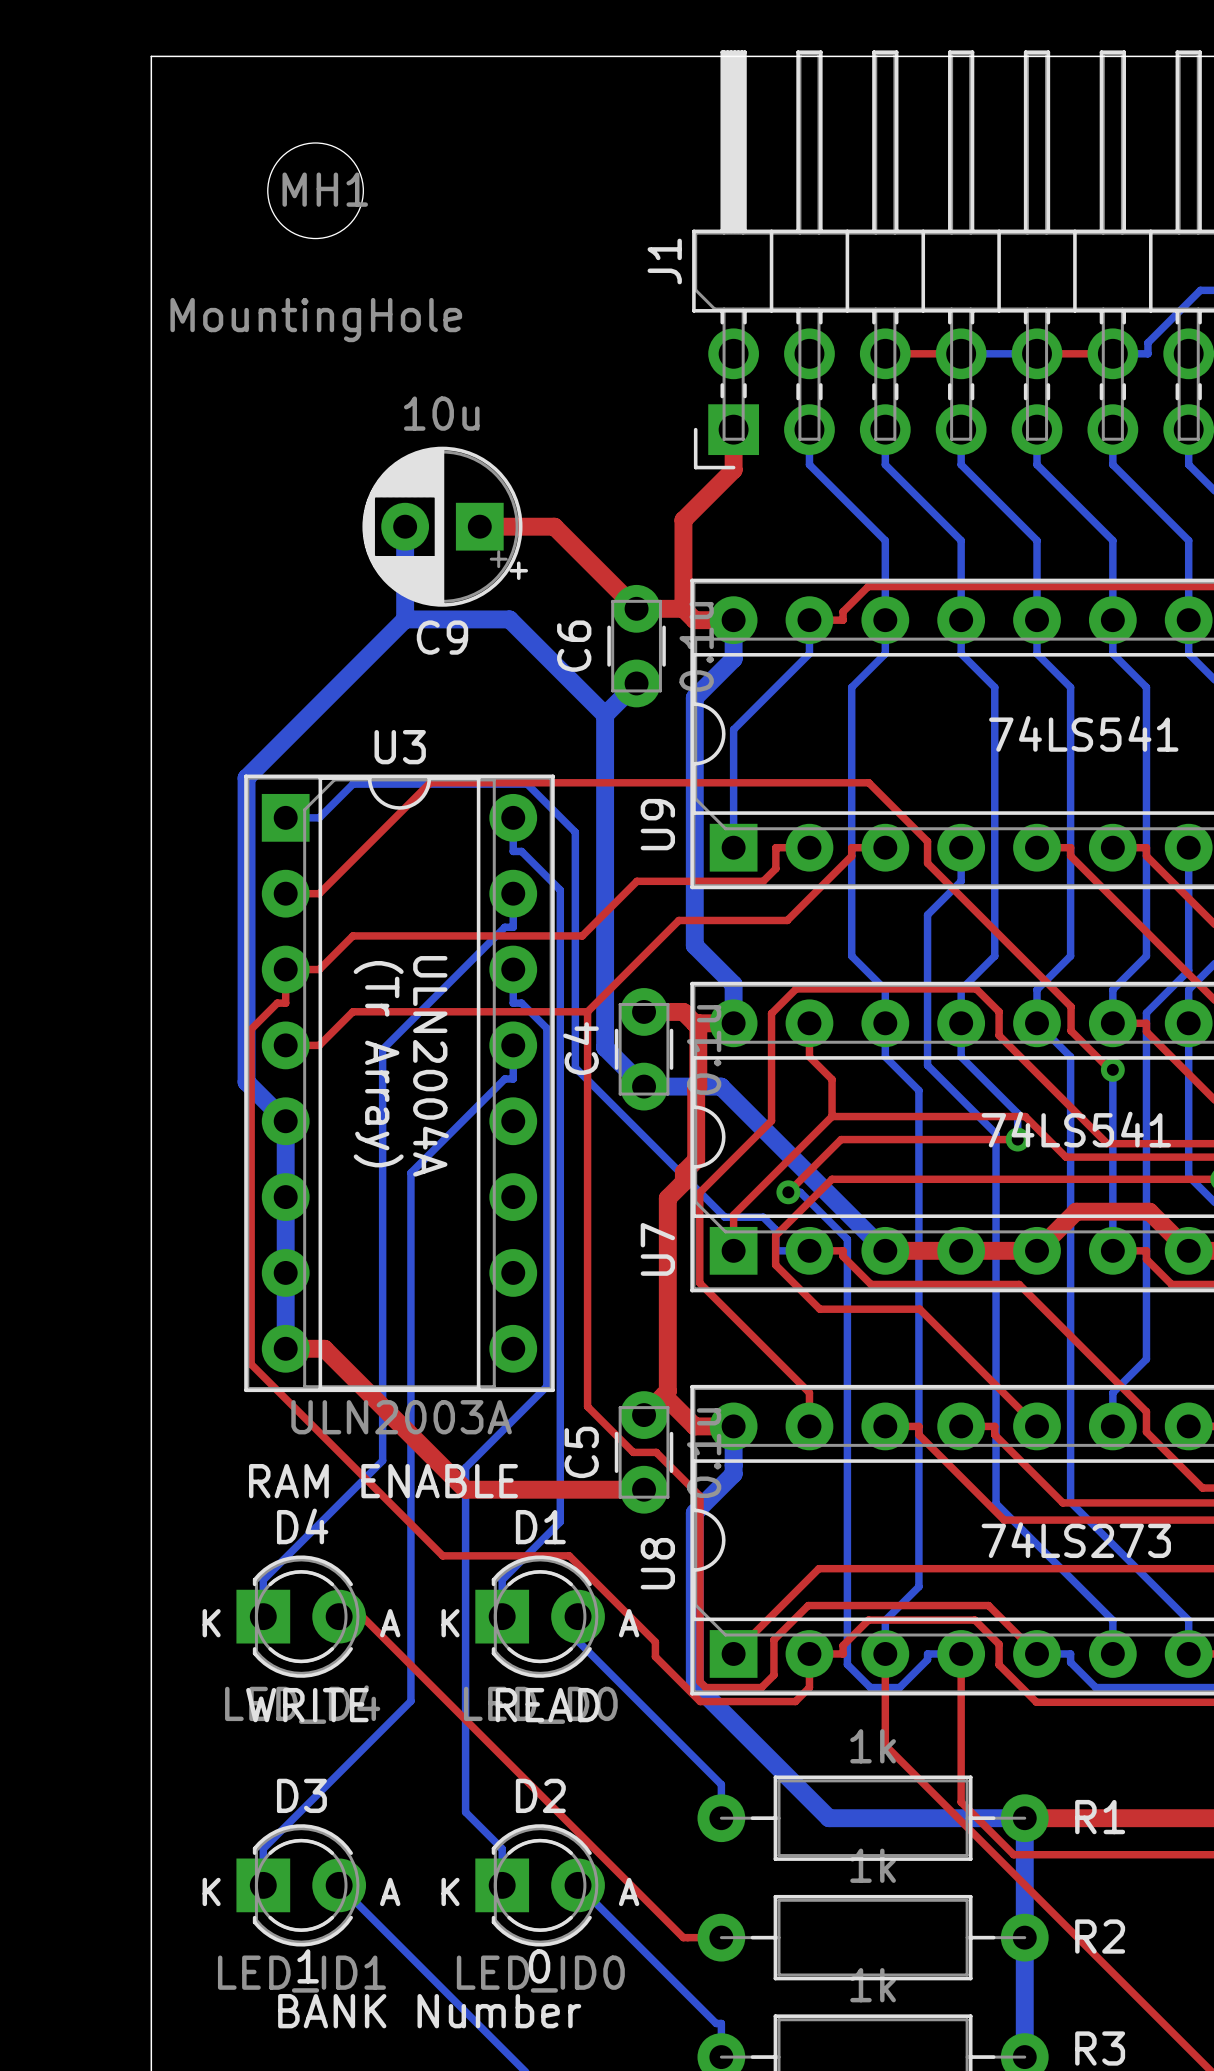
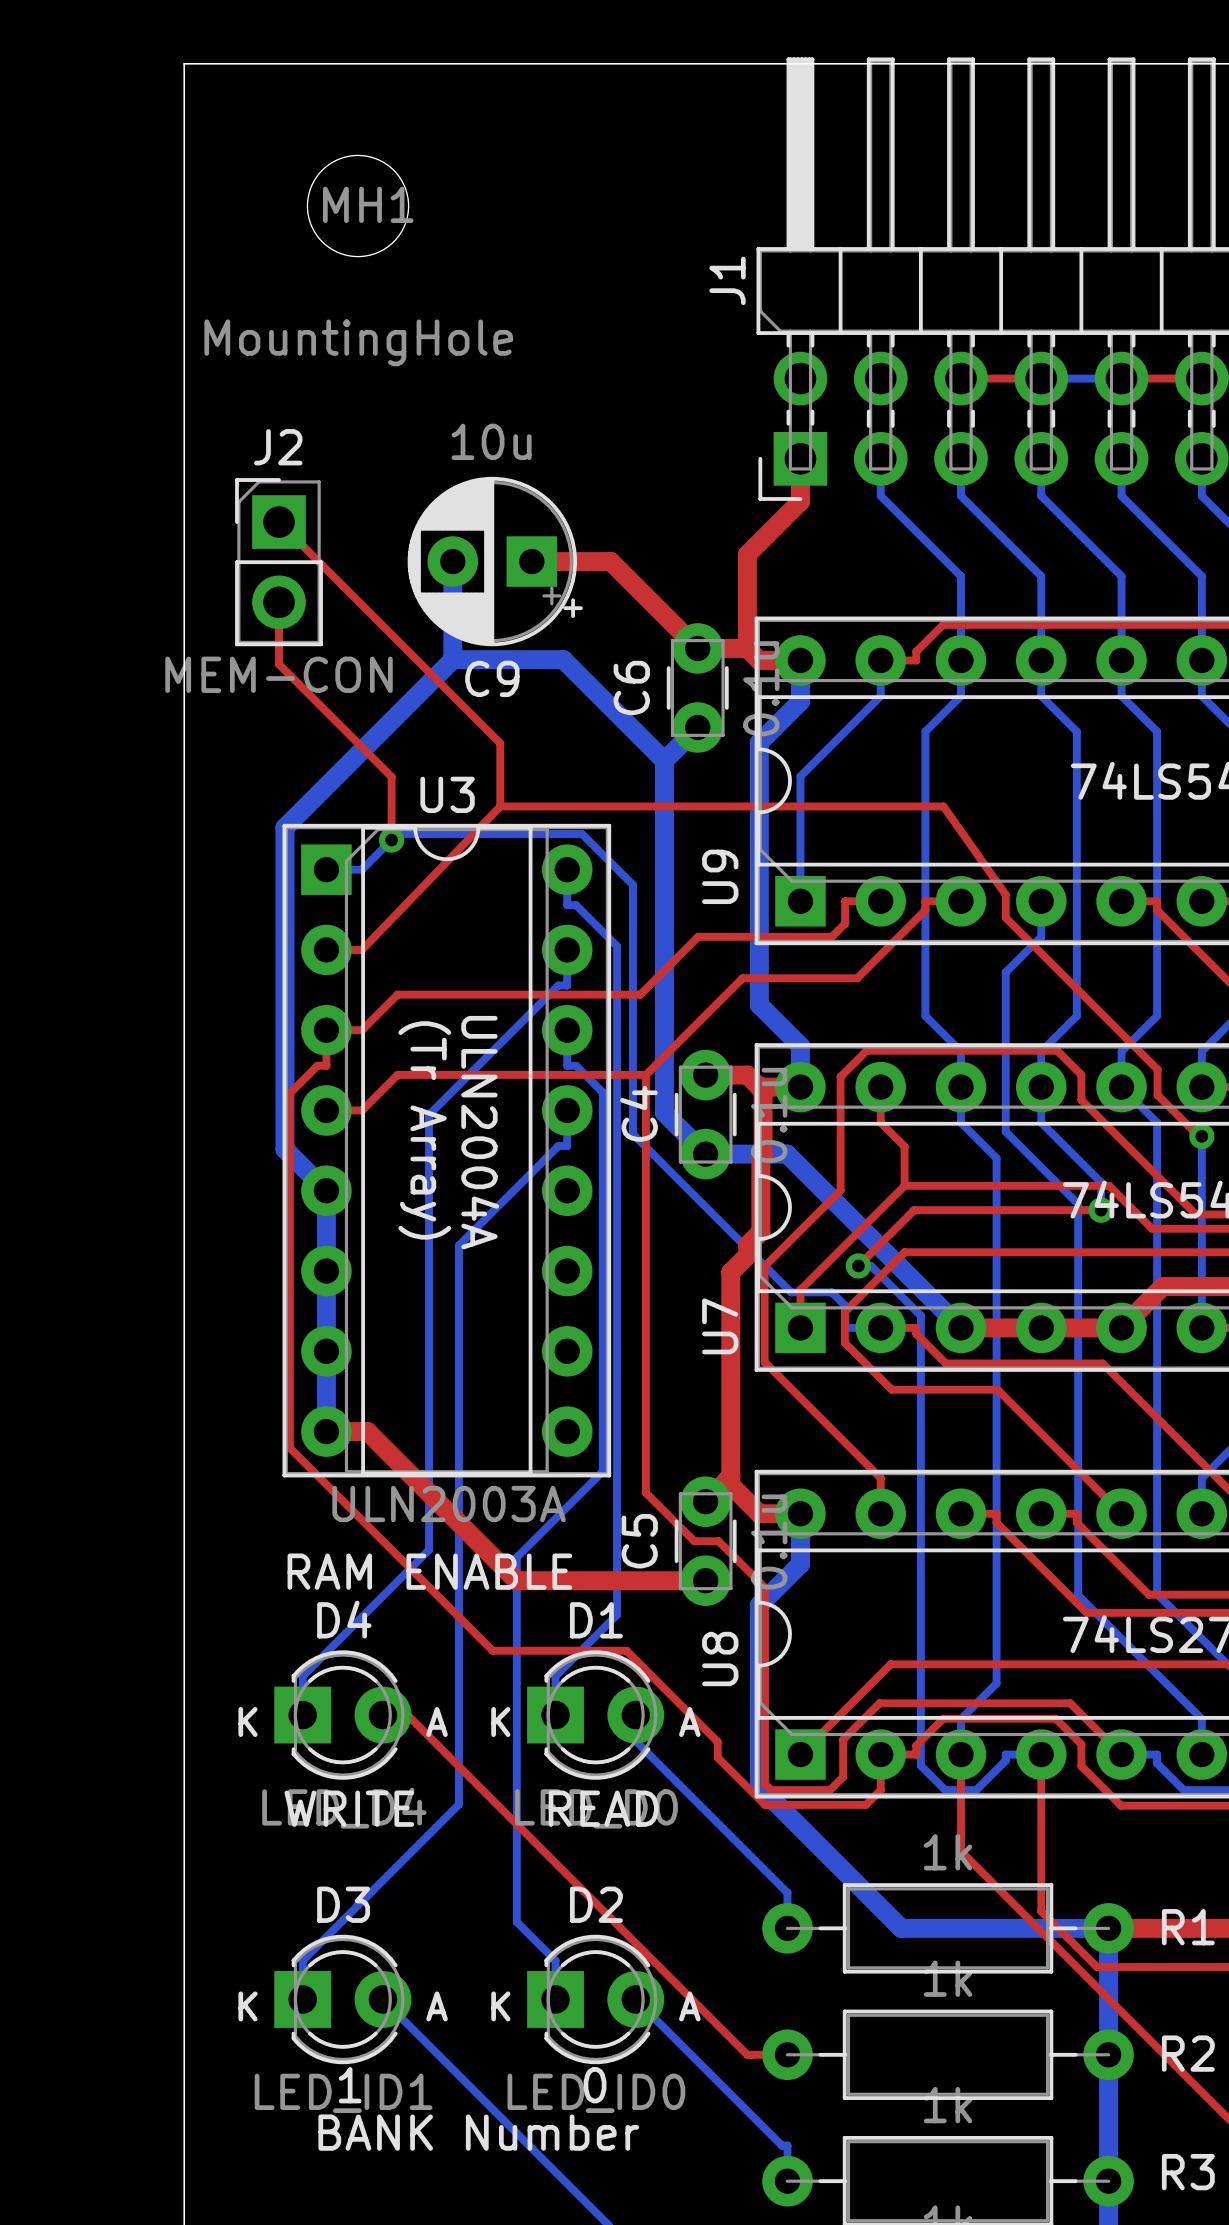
top track: none -> (279, 522) (500, 743) (500, 806)
J2: none -> MEM-CON (279, 562)
top track: none -> (279, 602) (279, 664) (391, 776) (391, 840)
top track: none -> (500, 806) (361, 949)
via: none -> (391, 840)
top track: (927, 841) (868, 782) (430, 782) (319, 893) -> (1005, 894) (943, 806) (500, 806)

